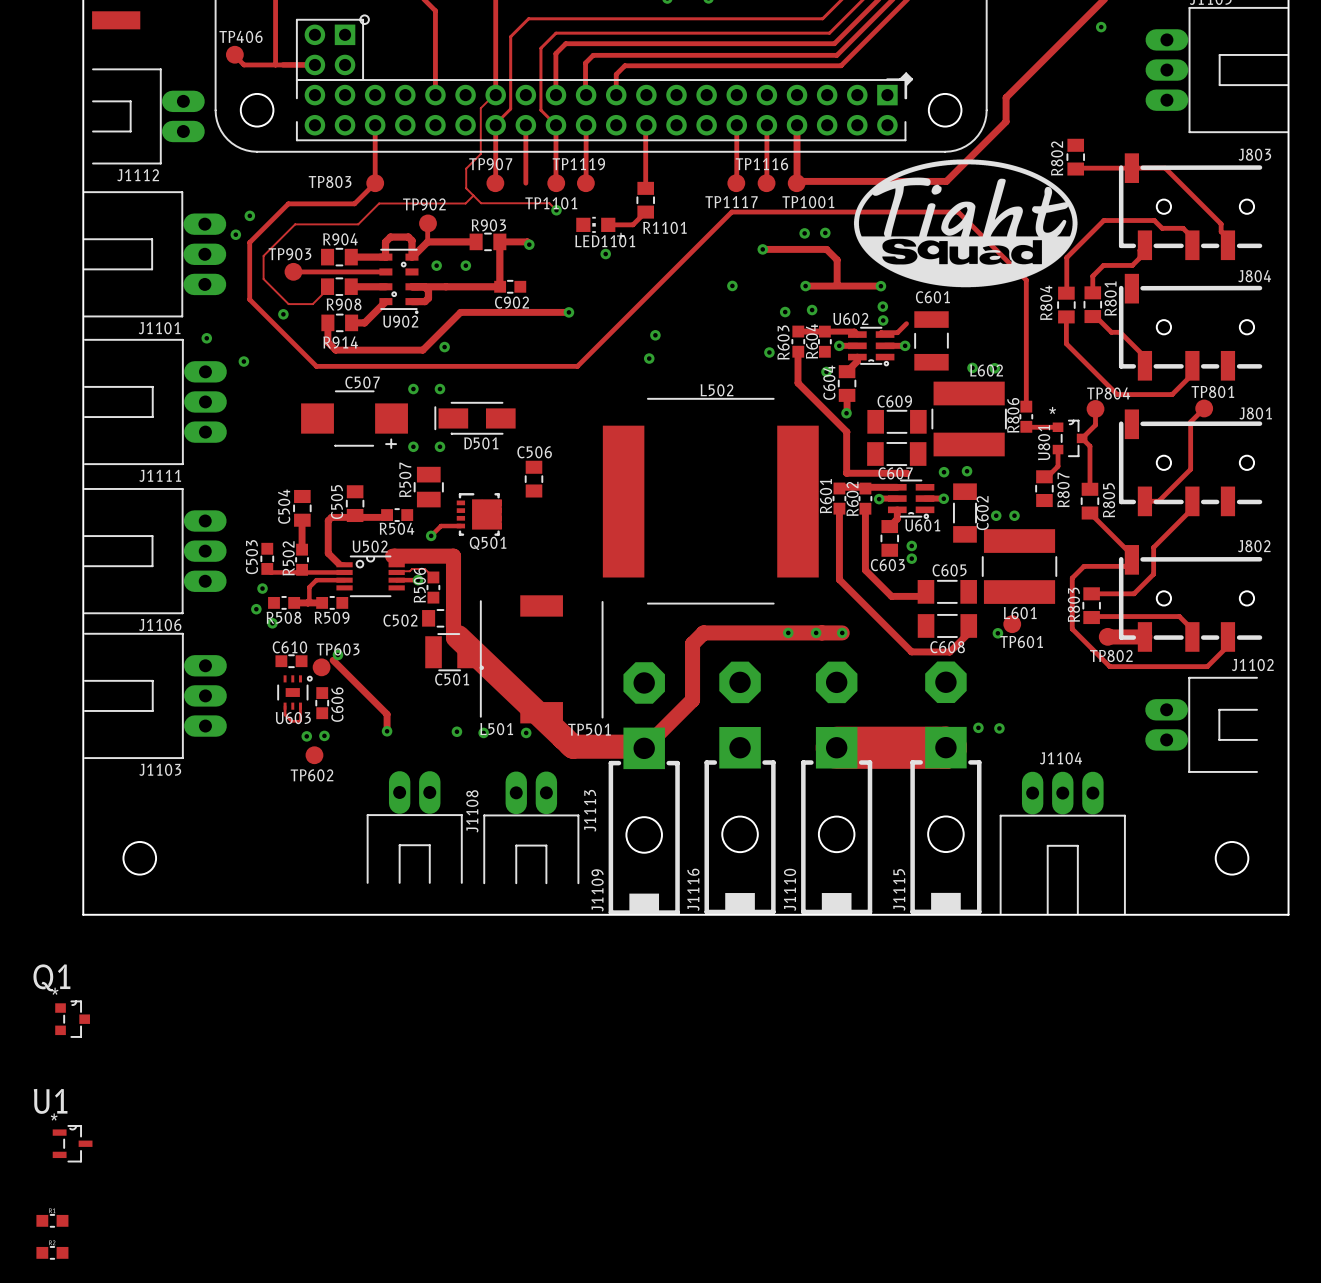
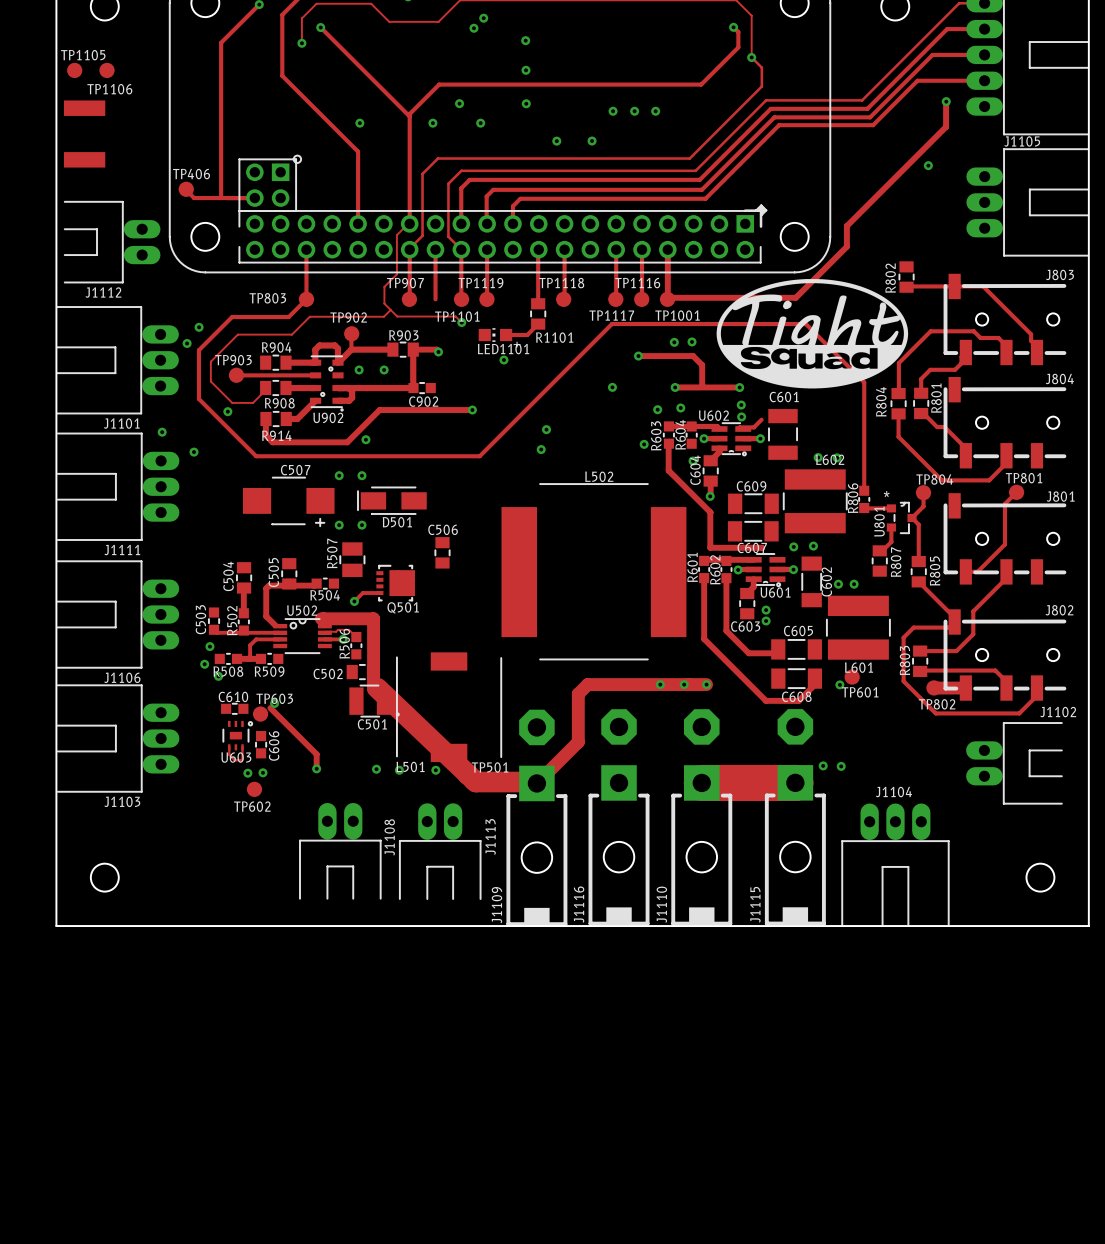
track: none -> (564, 249) (563, 299)
TP1118: none -> (563, 299)
Q1: (72, 1019) -> none
U1: (72, 1143) -> none
part: (52, 1220) -> none
part: (52, 1252) -> none

